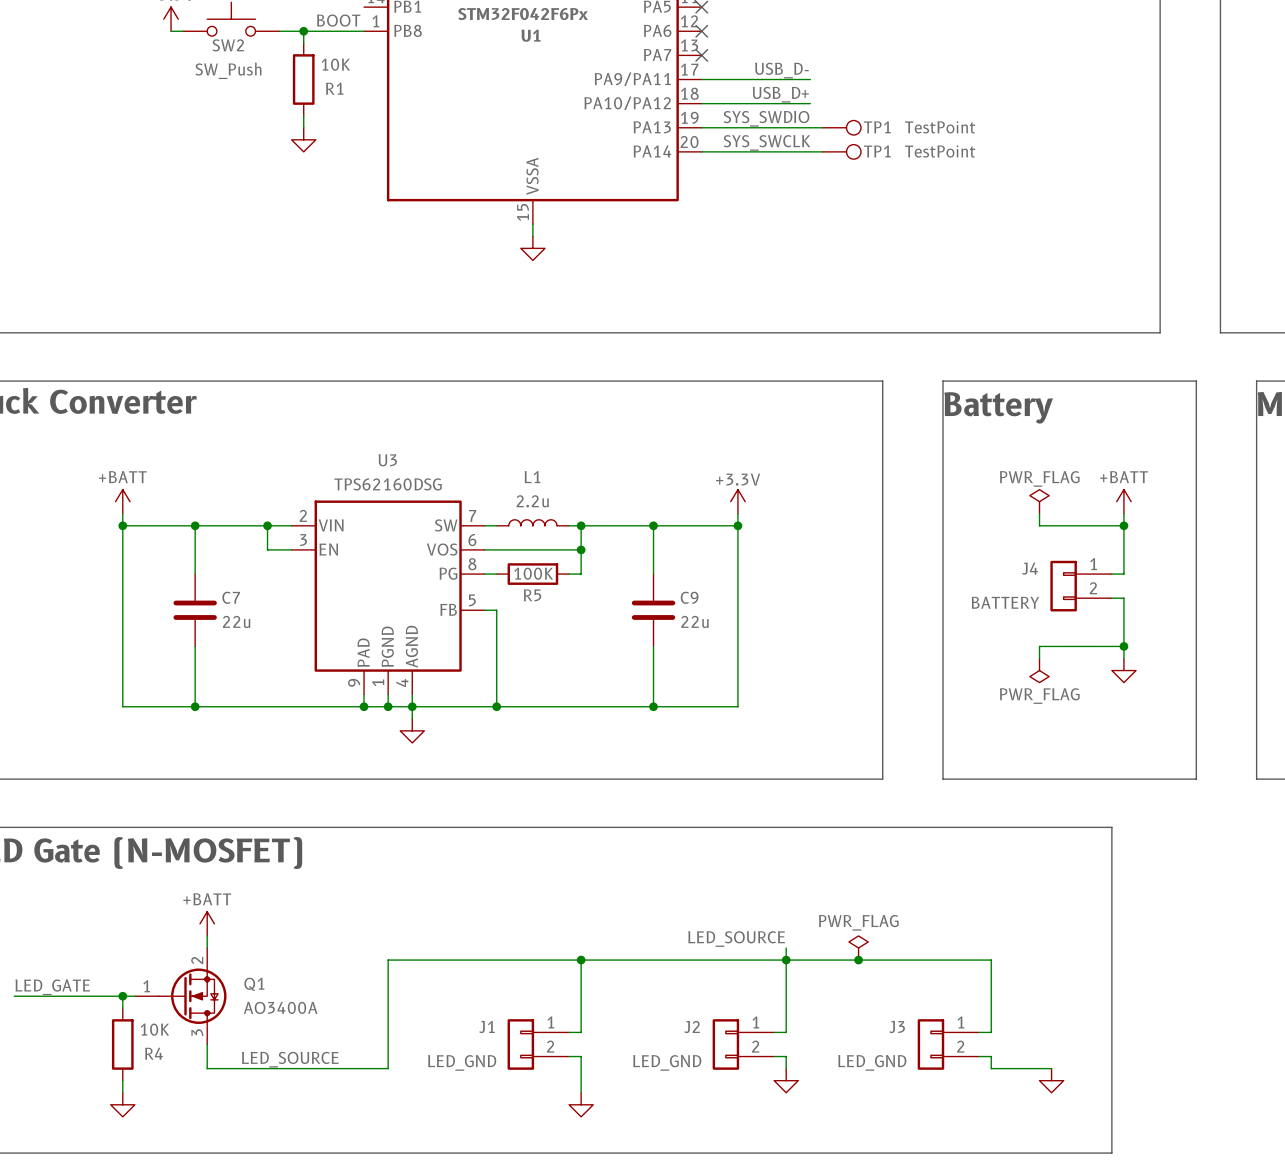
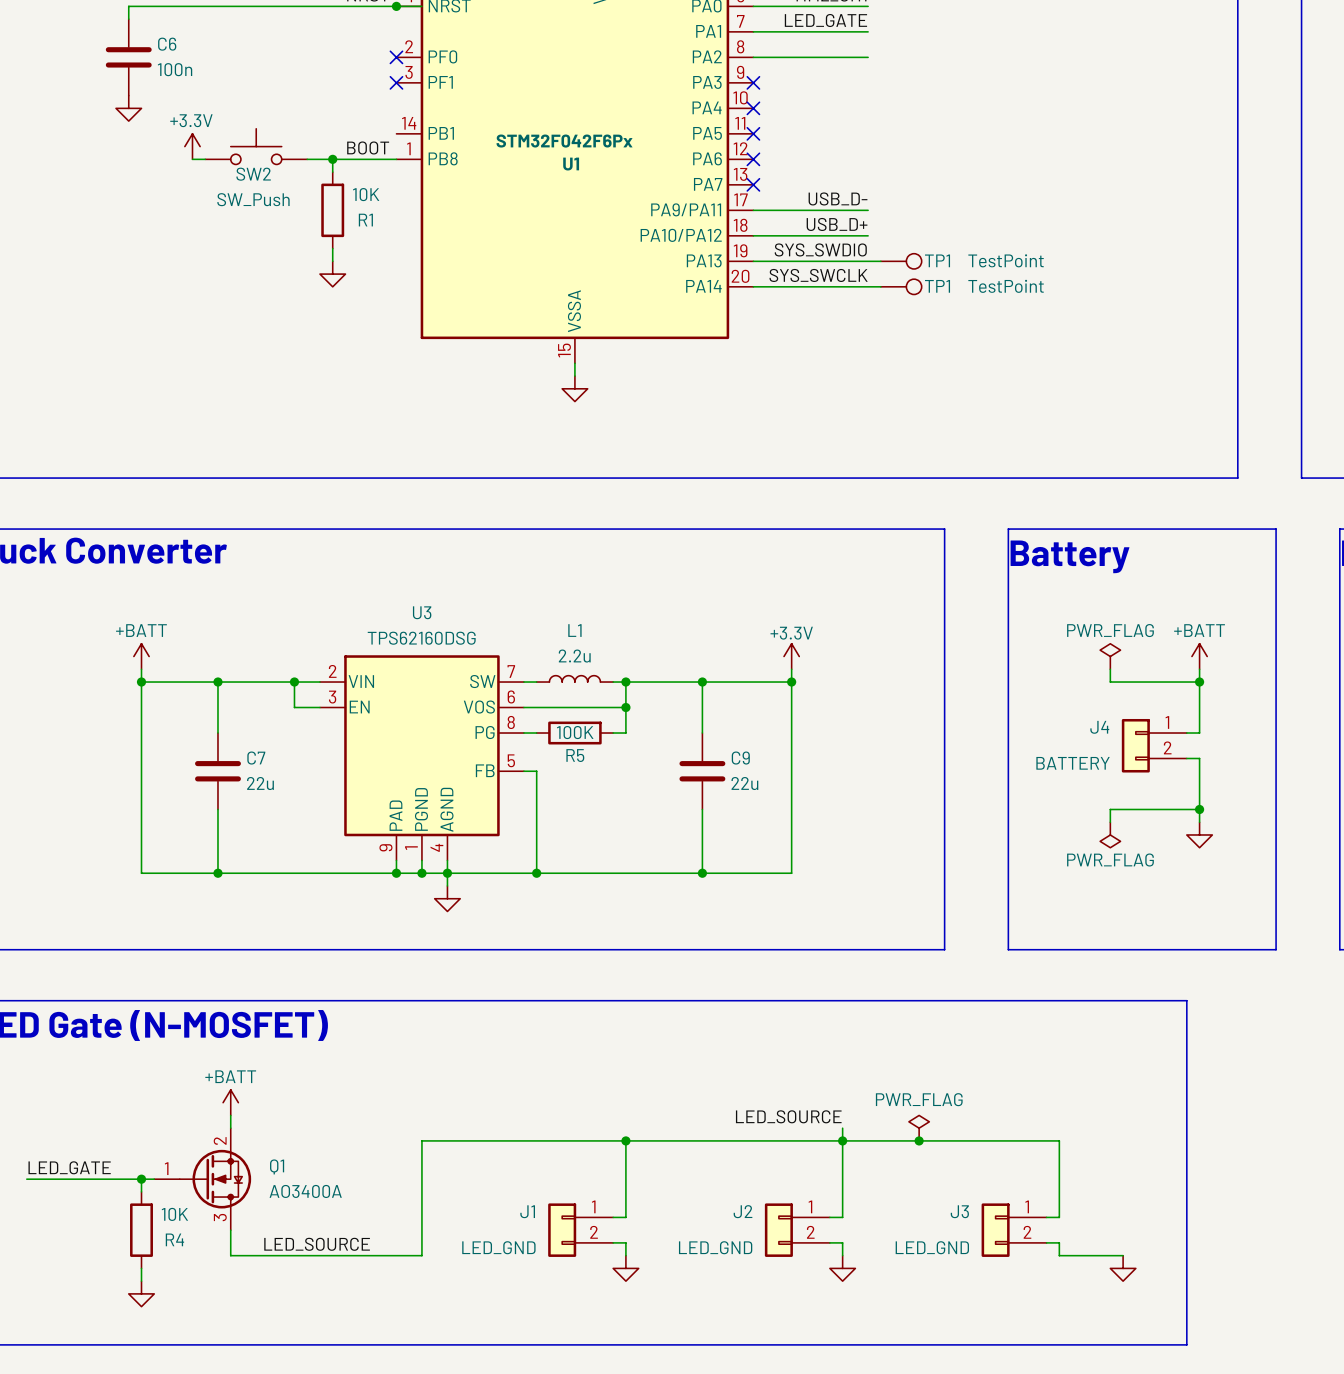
power symbol position: (581, 1104) -> (625, 1268)

